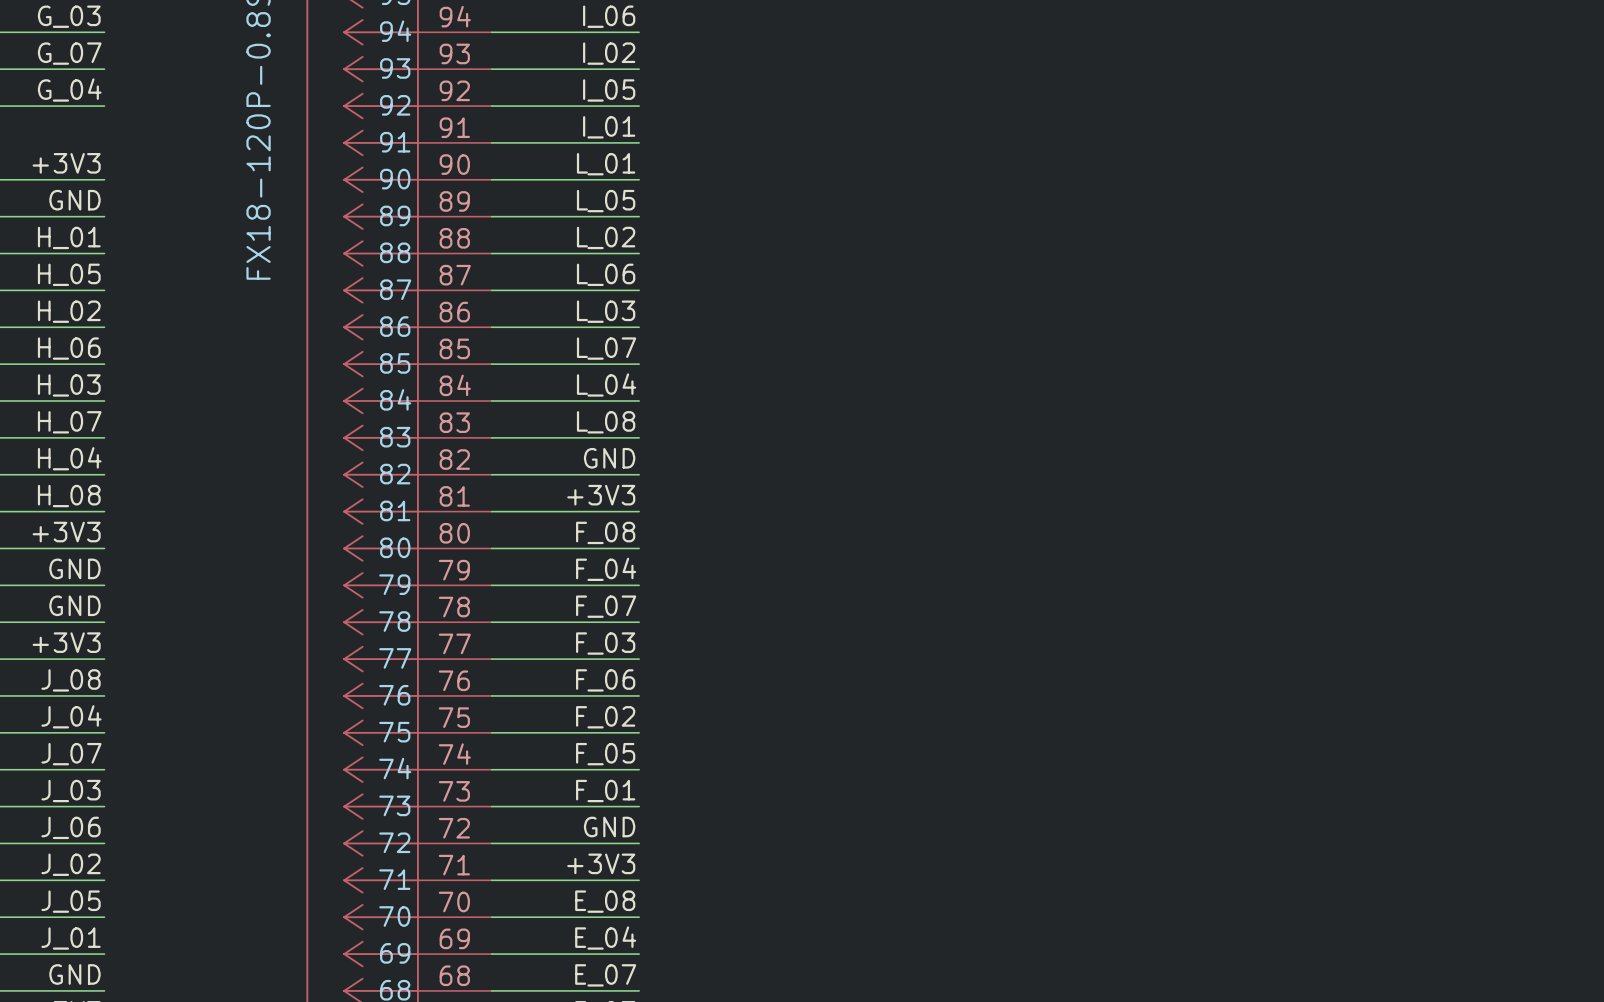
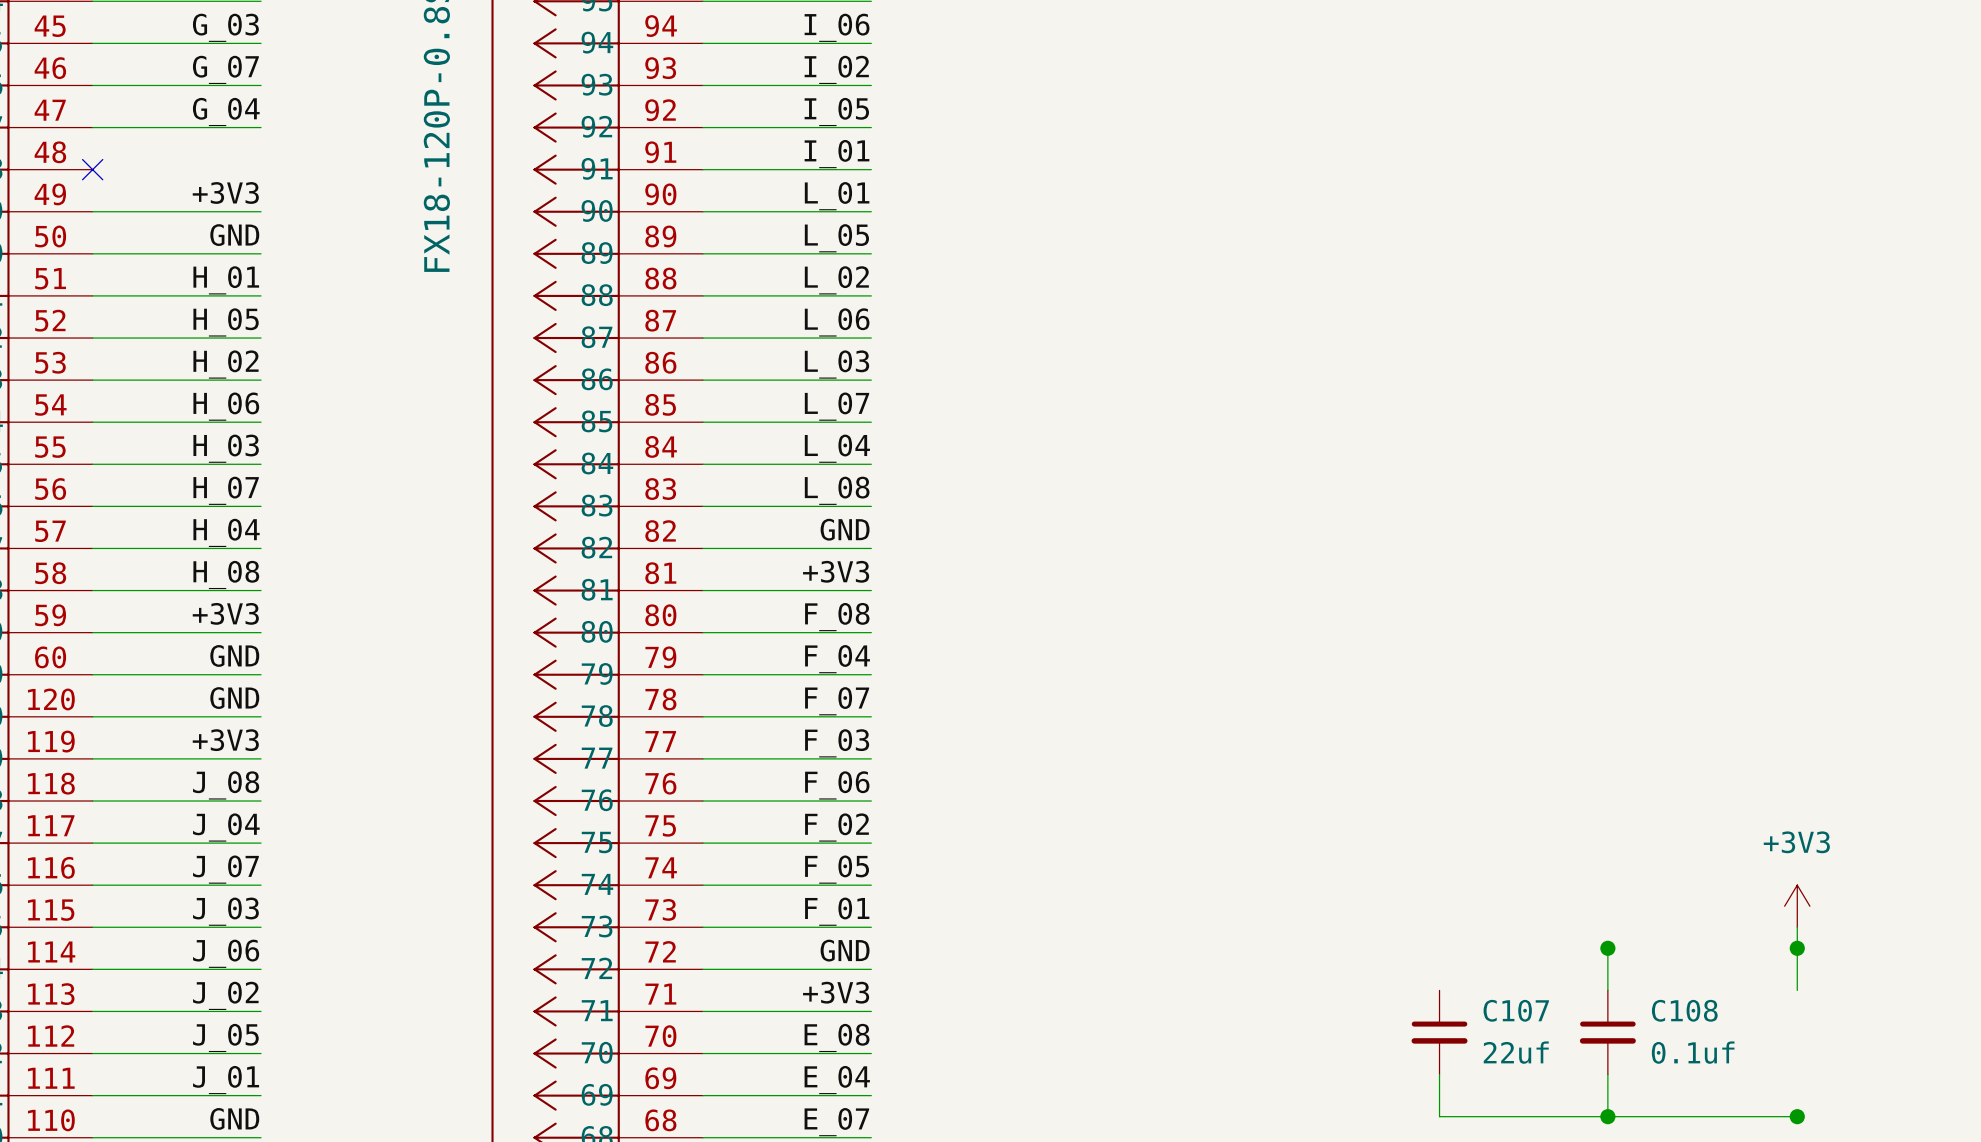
power symbol: none -> +3V3 (1797, 906)
wire: none -> (1797, 927) (1797, 990)
wire: none -> (1607, 948) (1607, 990)
junction: none -> (1607, 948)
junction: none -> (1797, 948)
C107: none -> 22uf (1439, 1032)
C108: none -> 0.1uf (1607, 1032)
wire: none -> (1439, 1074) (1439, 1116) (1797, 1116)
wire: none -> (1607, 1074) (1607, 1116)
junction: none -> (1607, 1116)
junction: none -> (1797, 1116)

